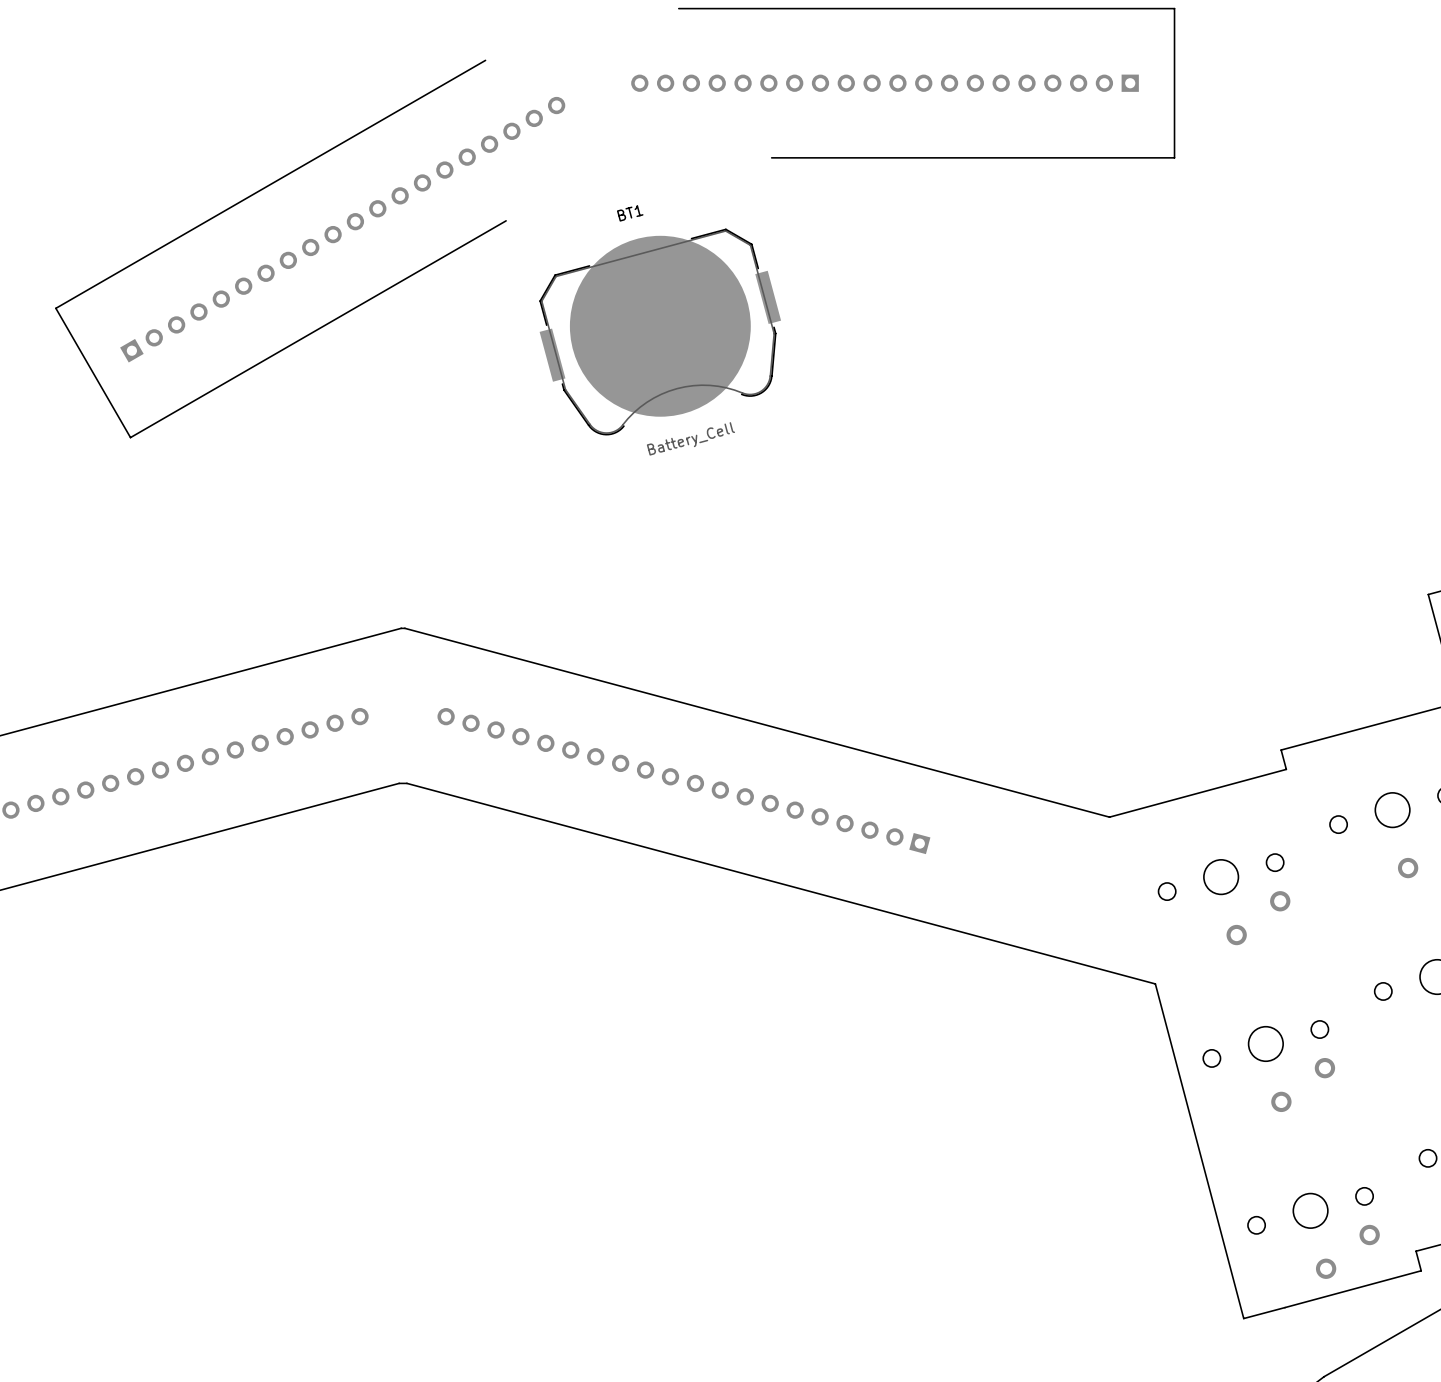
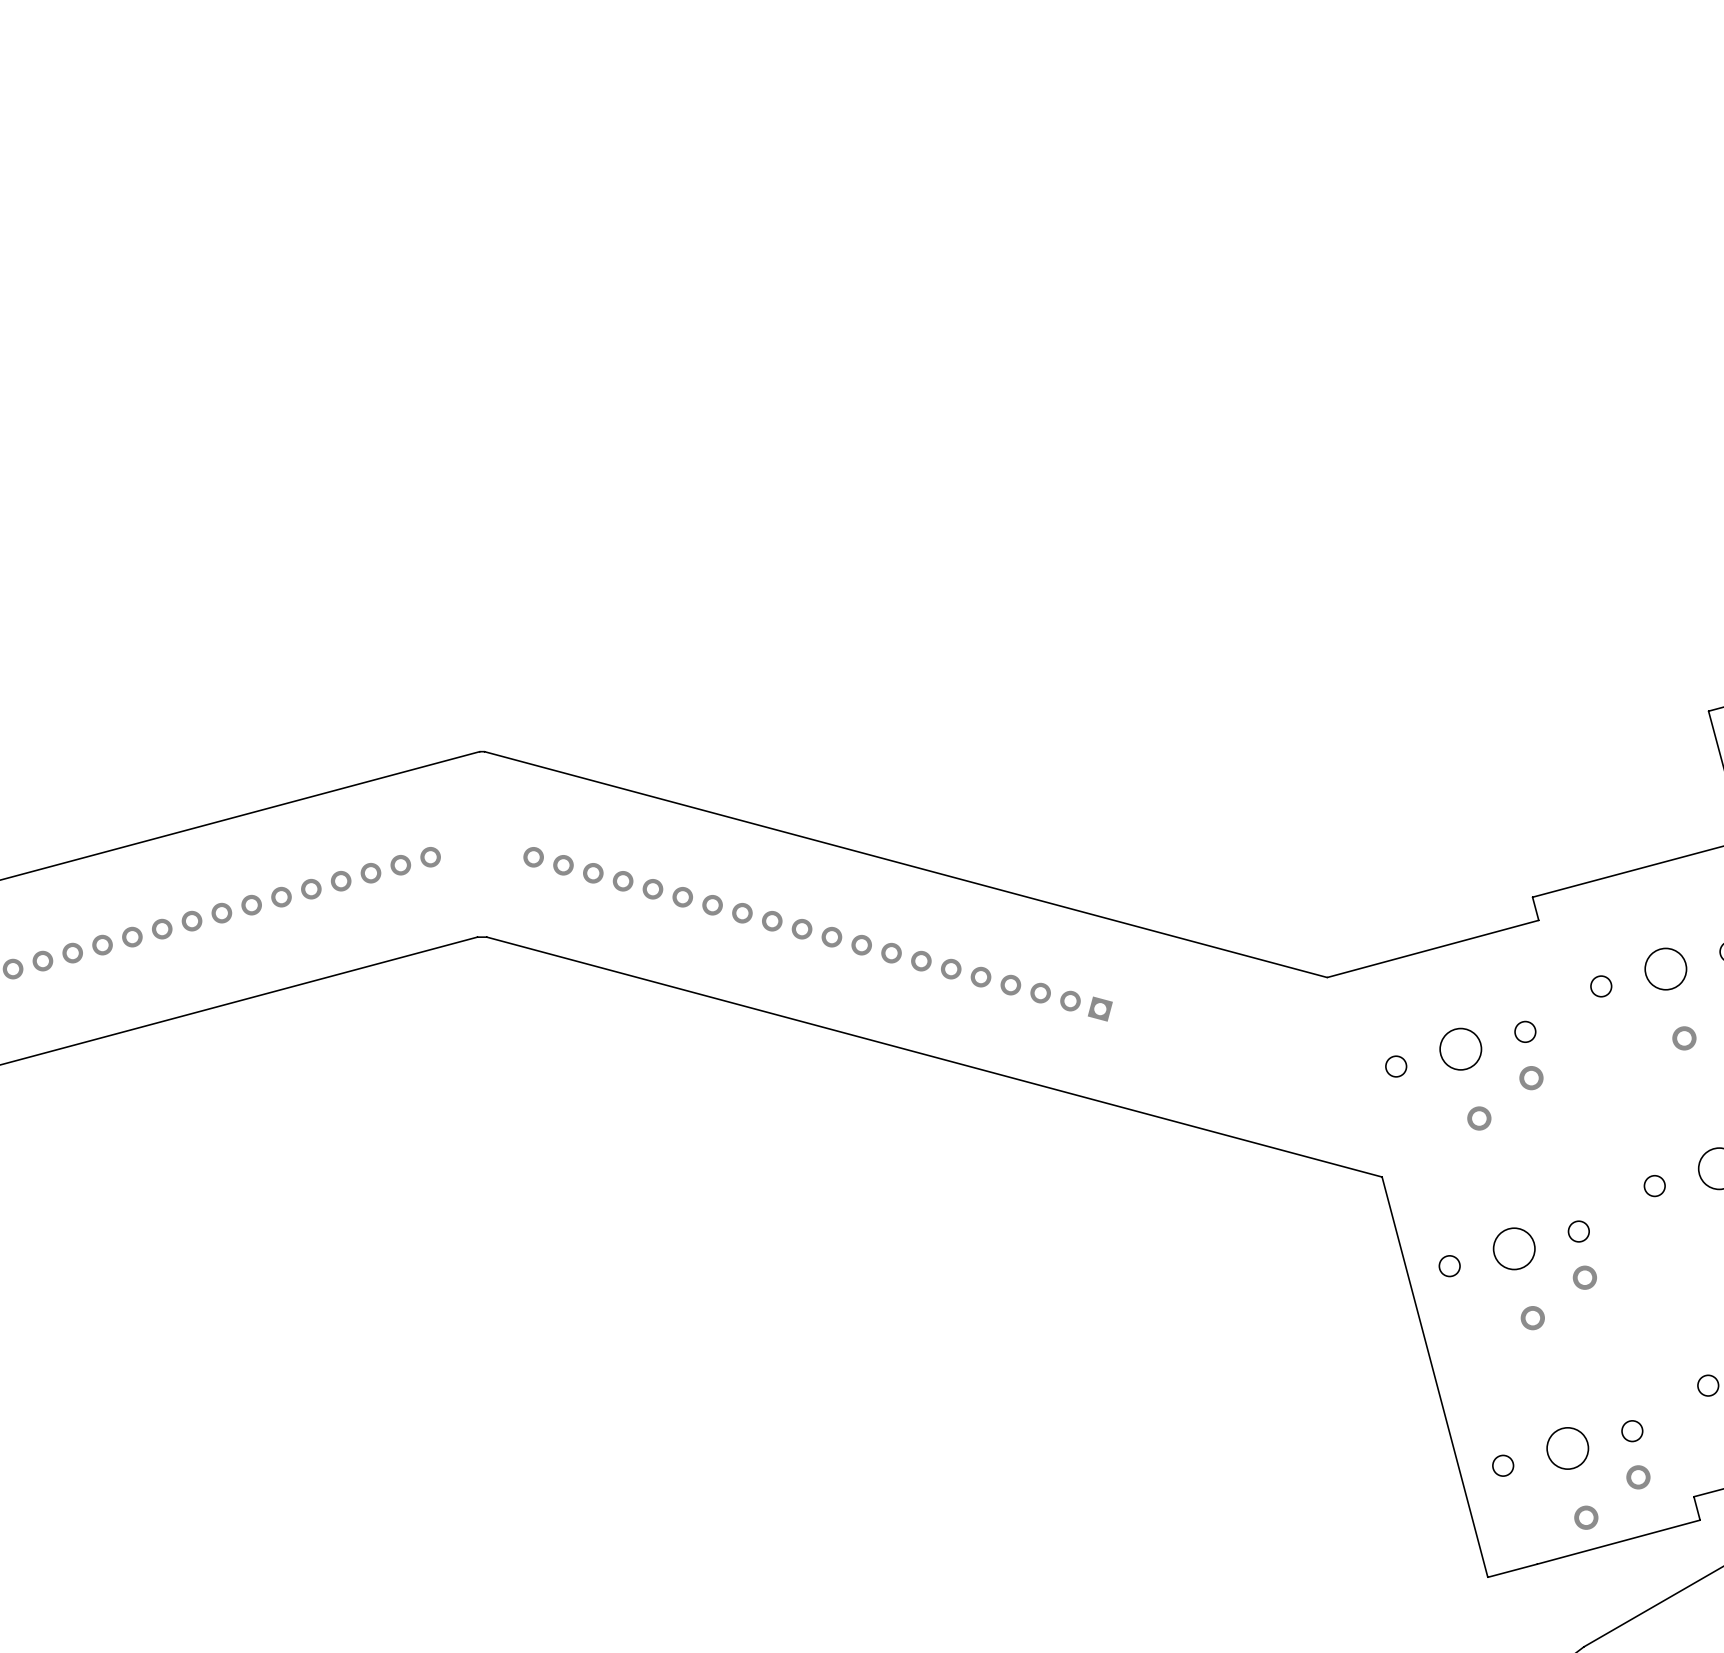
board edge: (678, 8) (1174, 8) (1174, 157) (771, 157) -> none
board edge: (485, 60) (55, 308) (130, 437) (506, 220) -> none
part: (885, 83) -> none
part: (342, 229) -> none
BT1: Battery_Cell (660, 332) -> none

